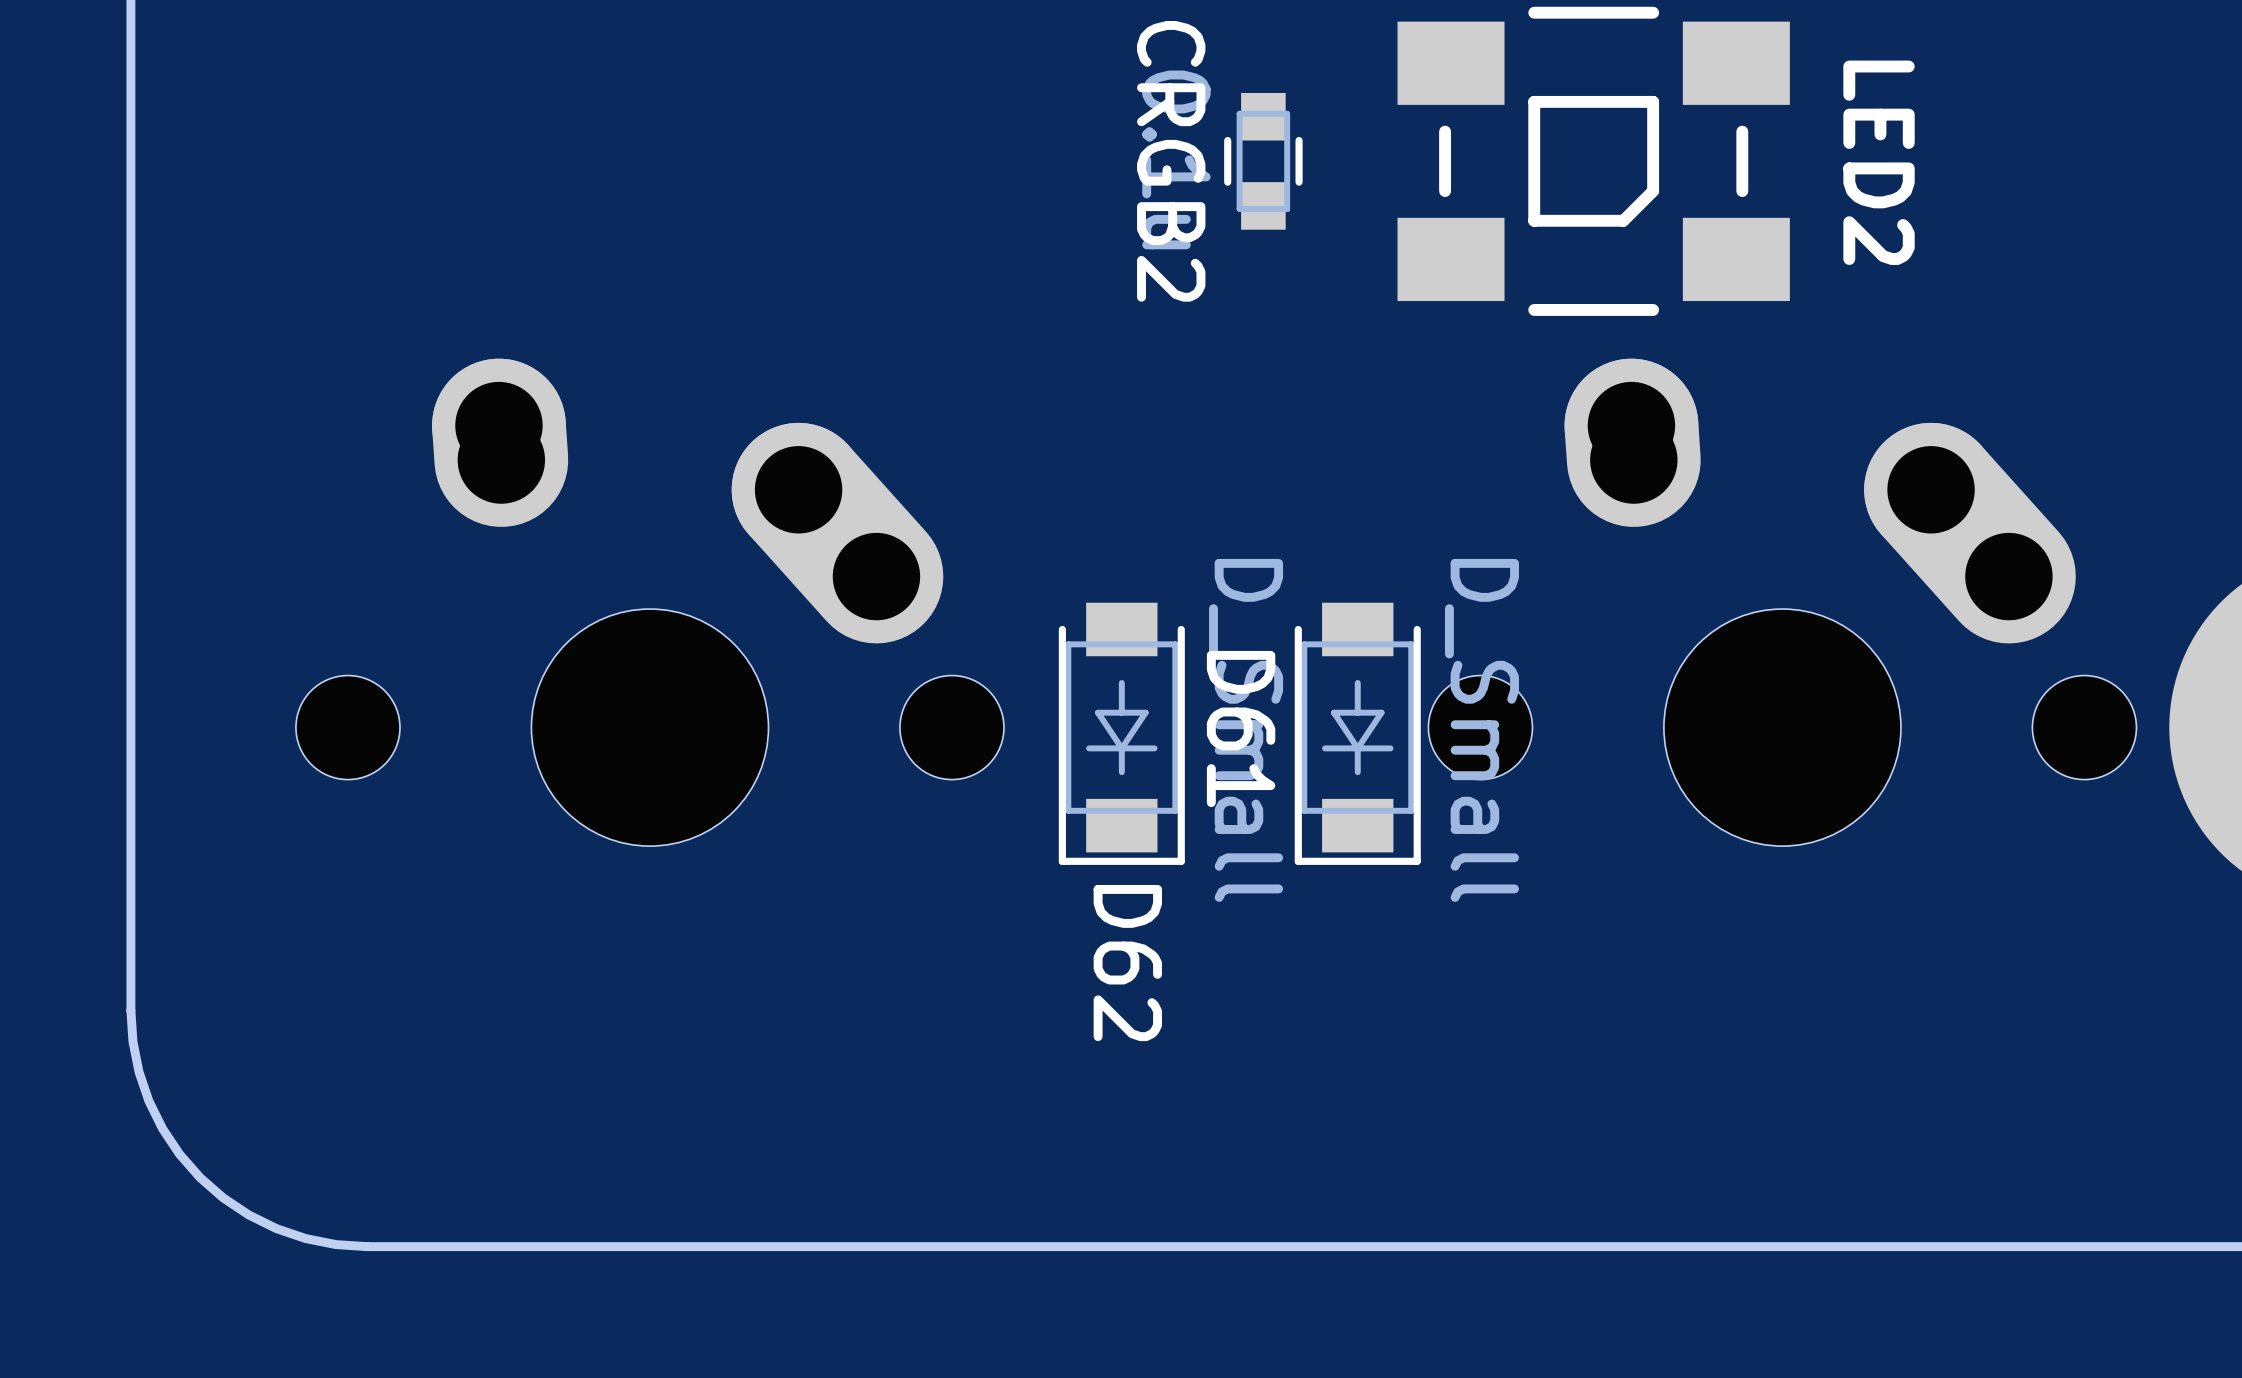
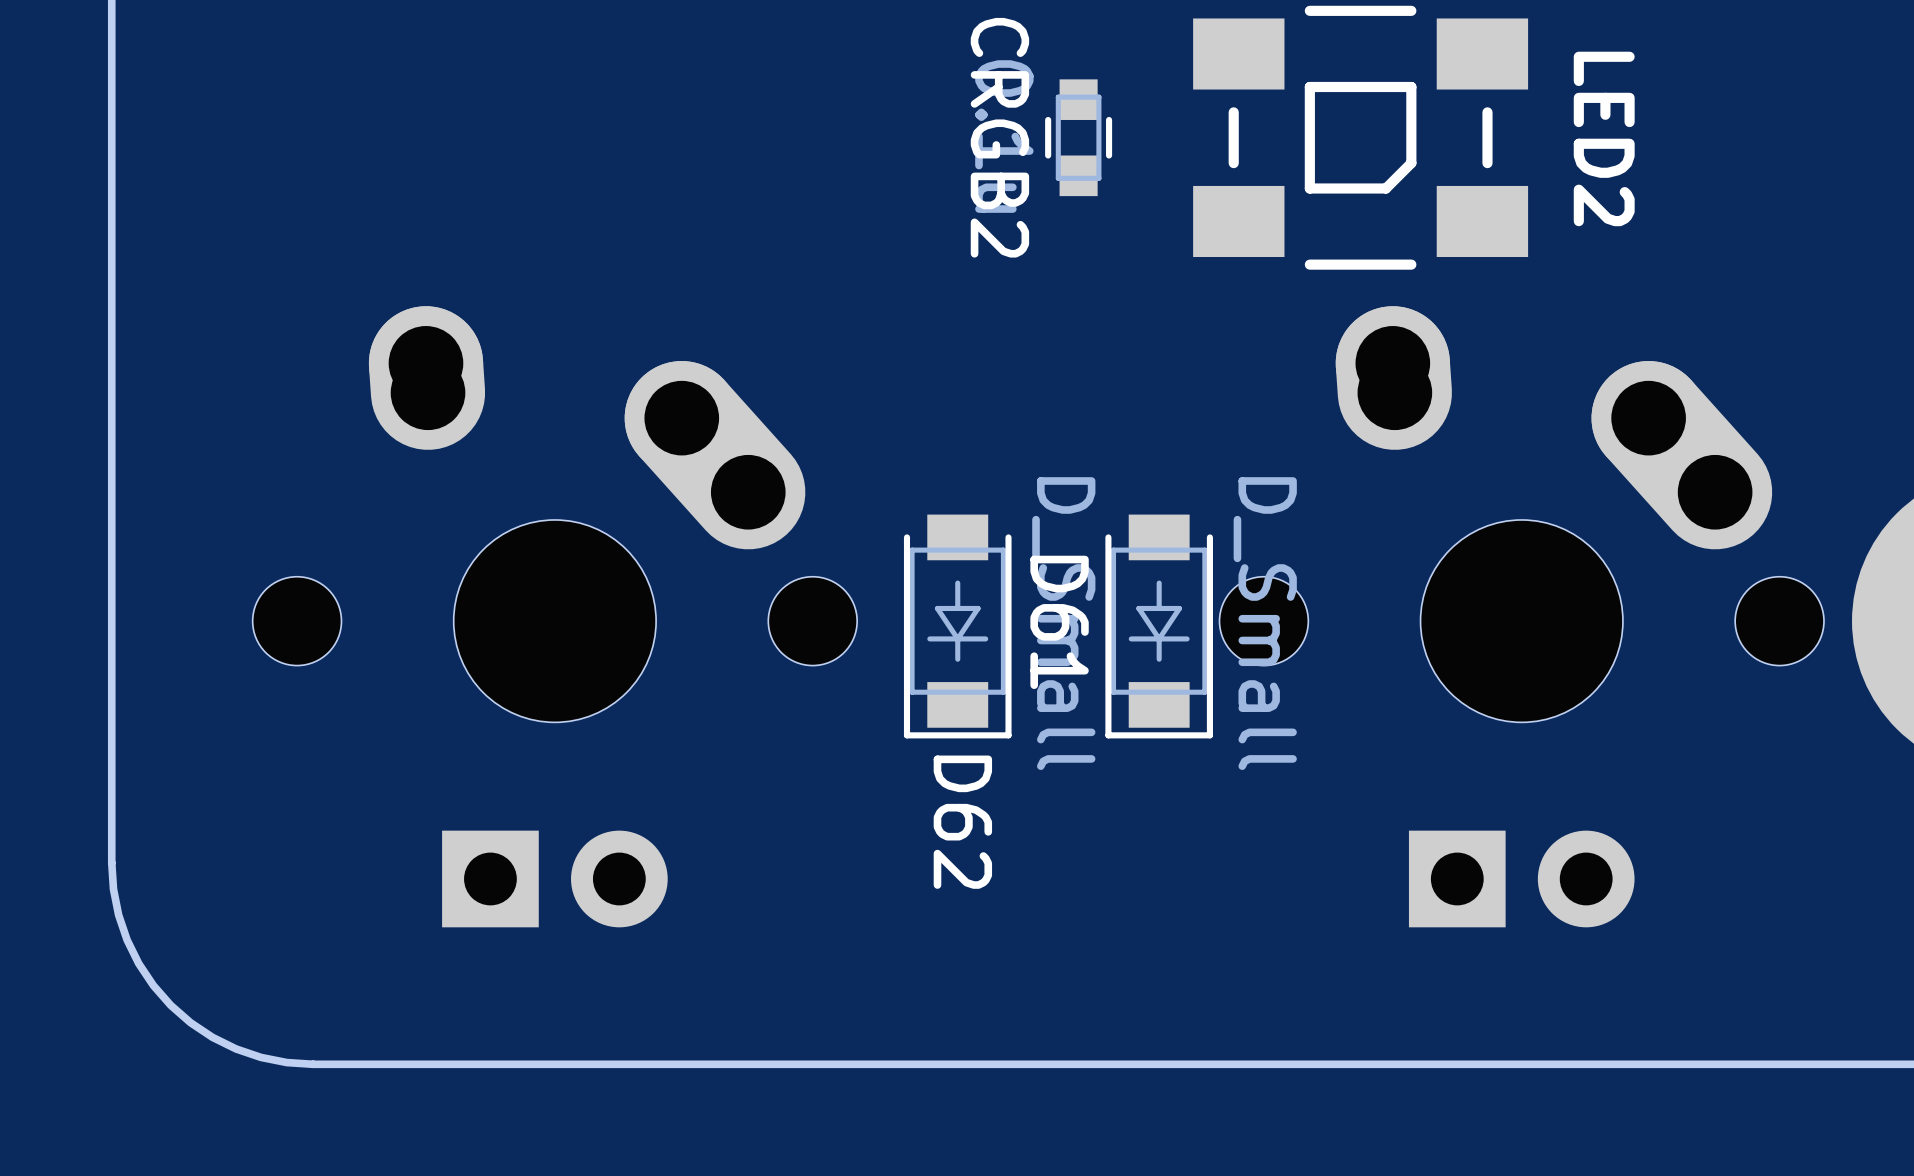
part: none -> (554, 616)
part: none -> (1521, 616)

